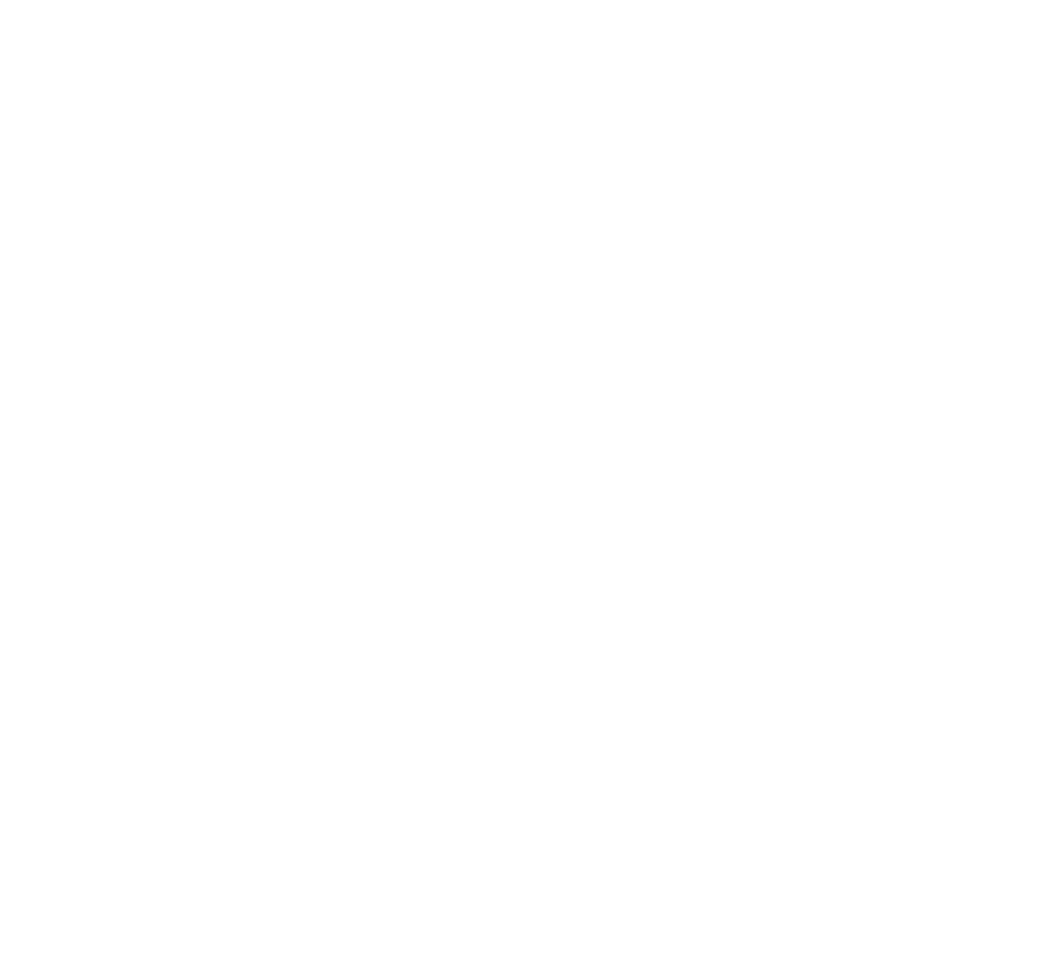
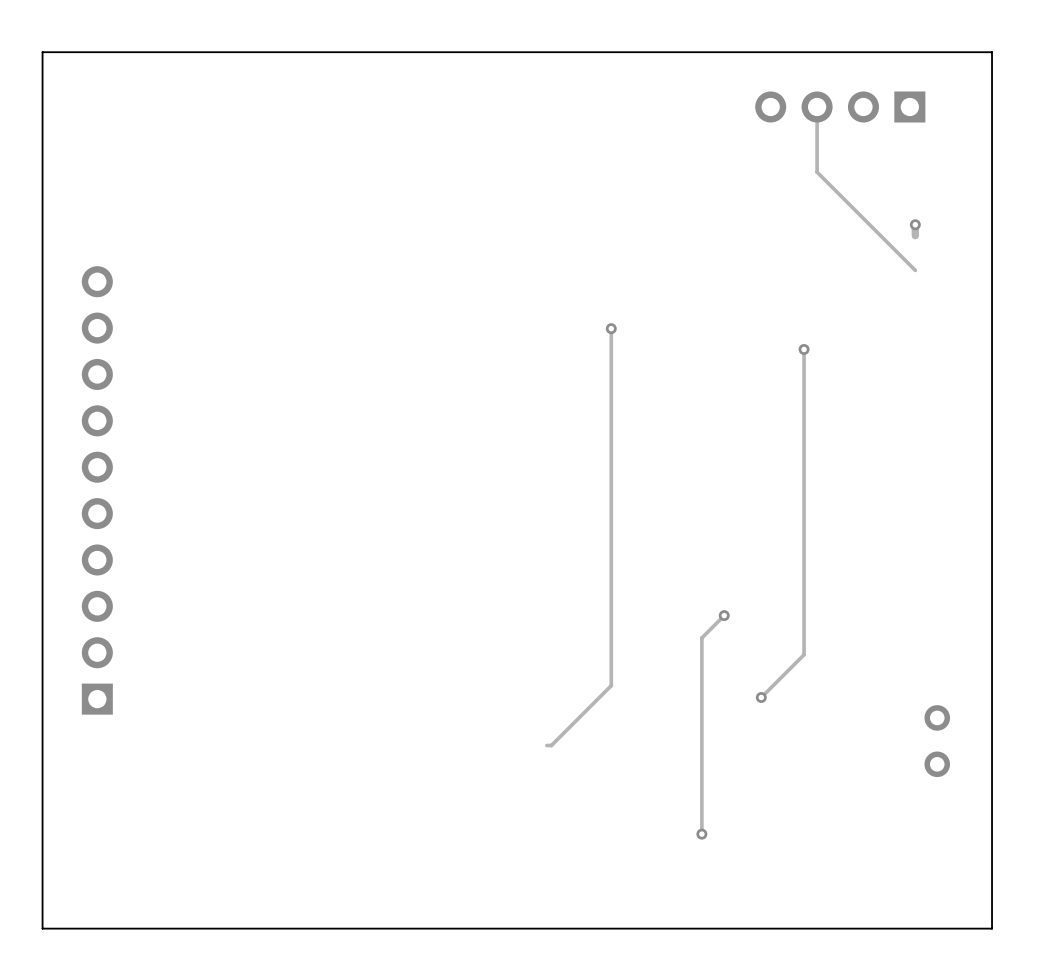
board edge: none -> (992, 52) (42, 52) (42, 928) (992, 928) (992, 52)
track: none -> (817, 106) (817, 172) (915, 270)
part: none -> (840, 106)
track: none -> (915, 224) (915, 235)
via: none -> (915, 224)
track: none -> (611, 328) (611, 685) (551, 745) (546, 745)
via: none -> (611, 328)
track: none -> (804, 349) (804, 654) (761, 697)
via: none -> (804, 349)
part: none -> (97, 490)
track: none -> (724, 615) (701, 637) (701, 834)
via: none -> (724, 615)
via: none -> (761, 697)
part: none -> (937, 741)
via: none -> (701, 834)

